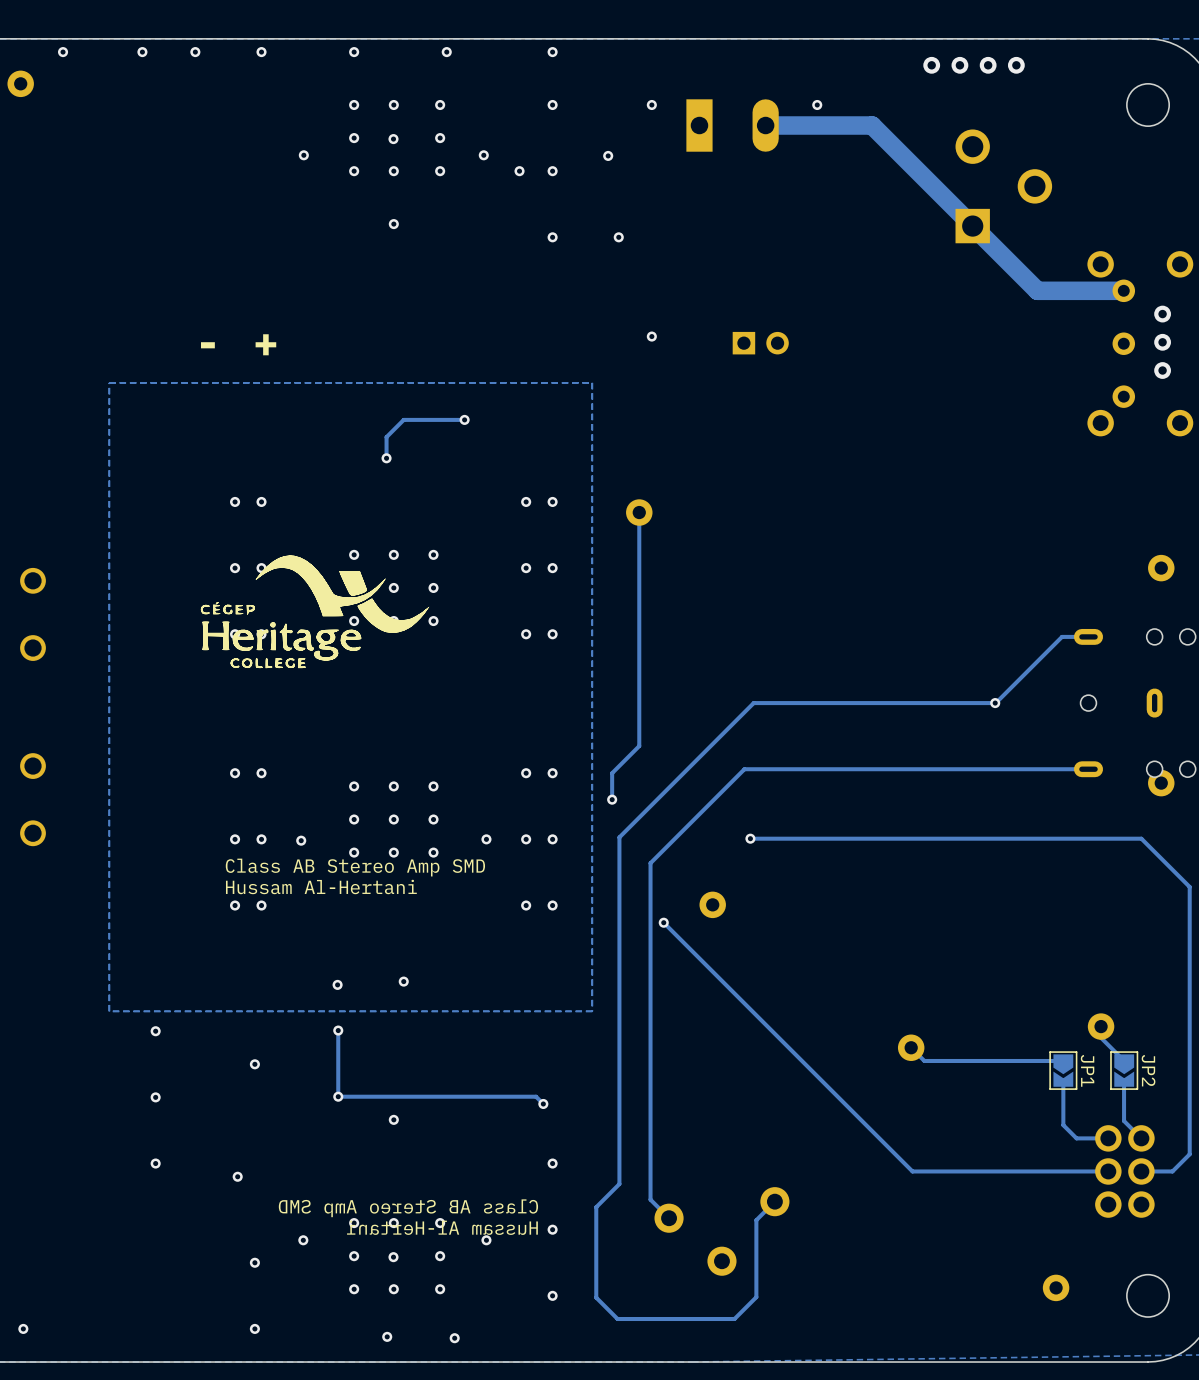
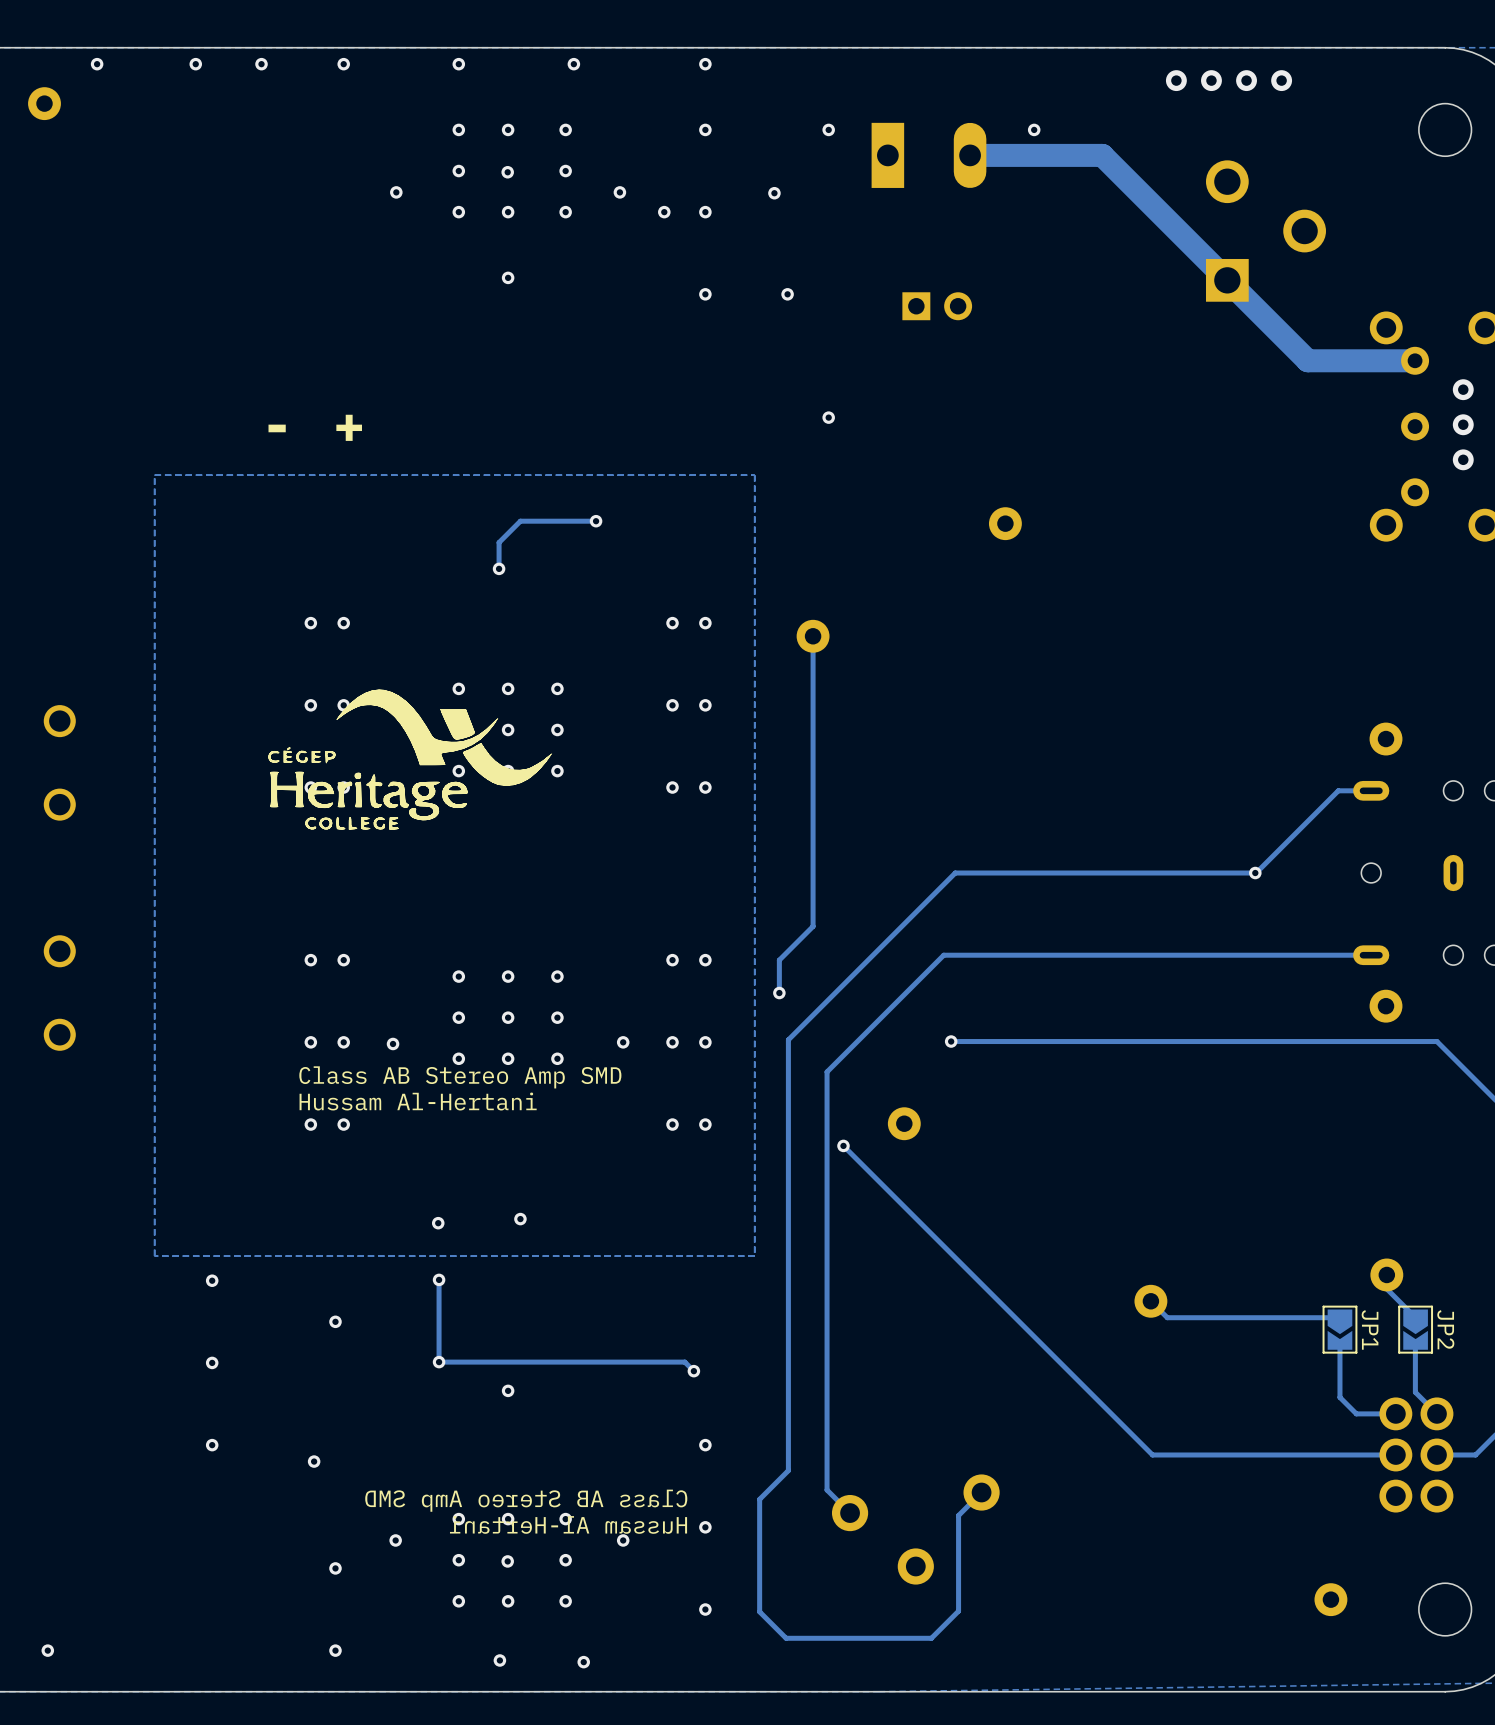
part position: (760, 343) -> (937, 306)
part: none -> (1005, 523)
part position: (1161, 568) -> (1386, 739)
part position: (1161, 783) -> (1386, 1006)

